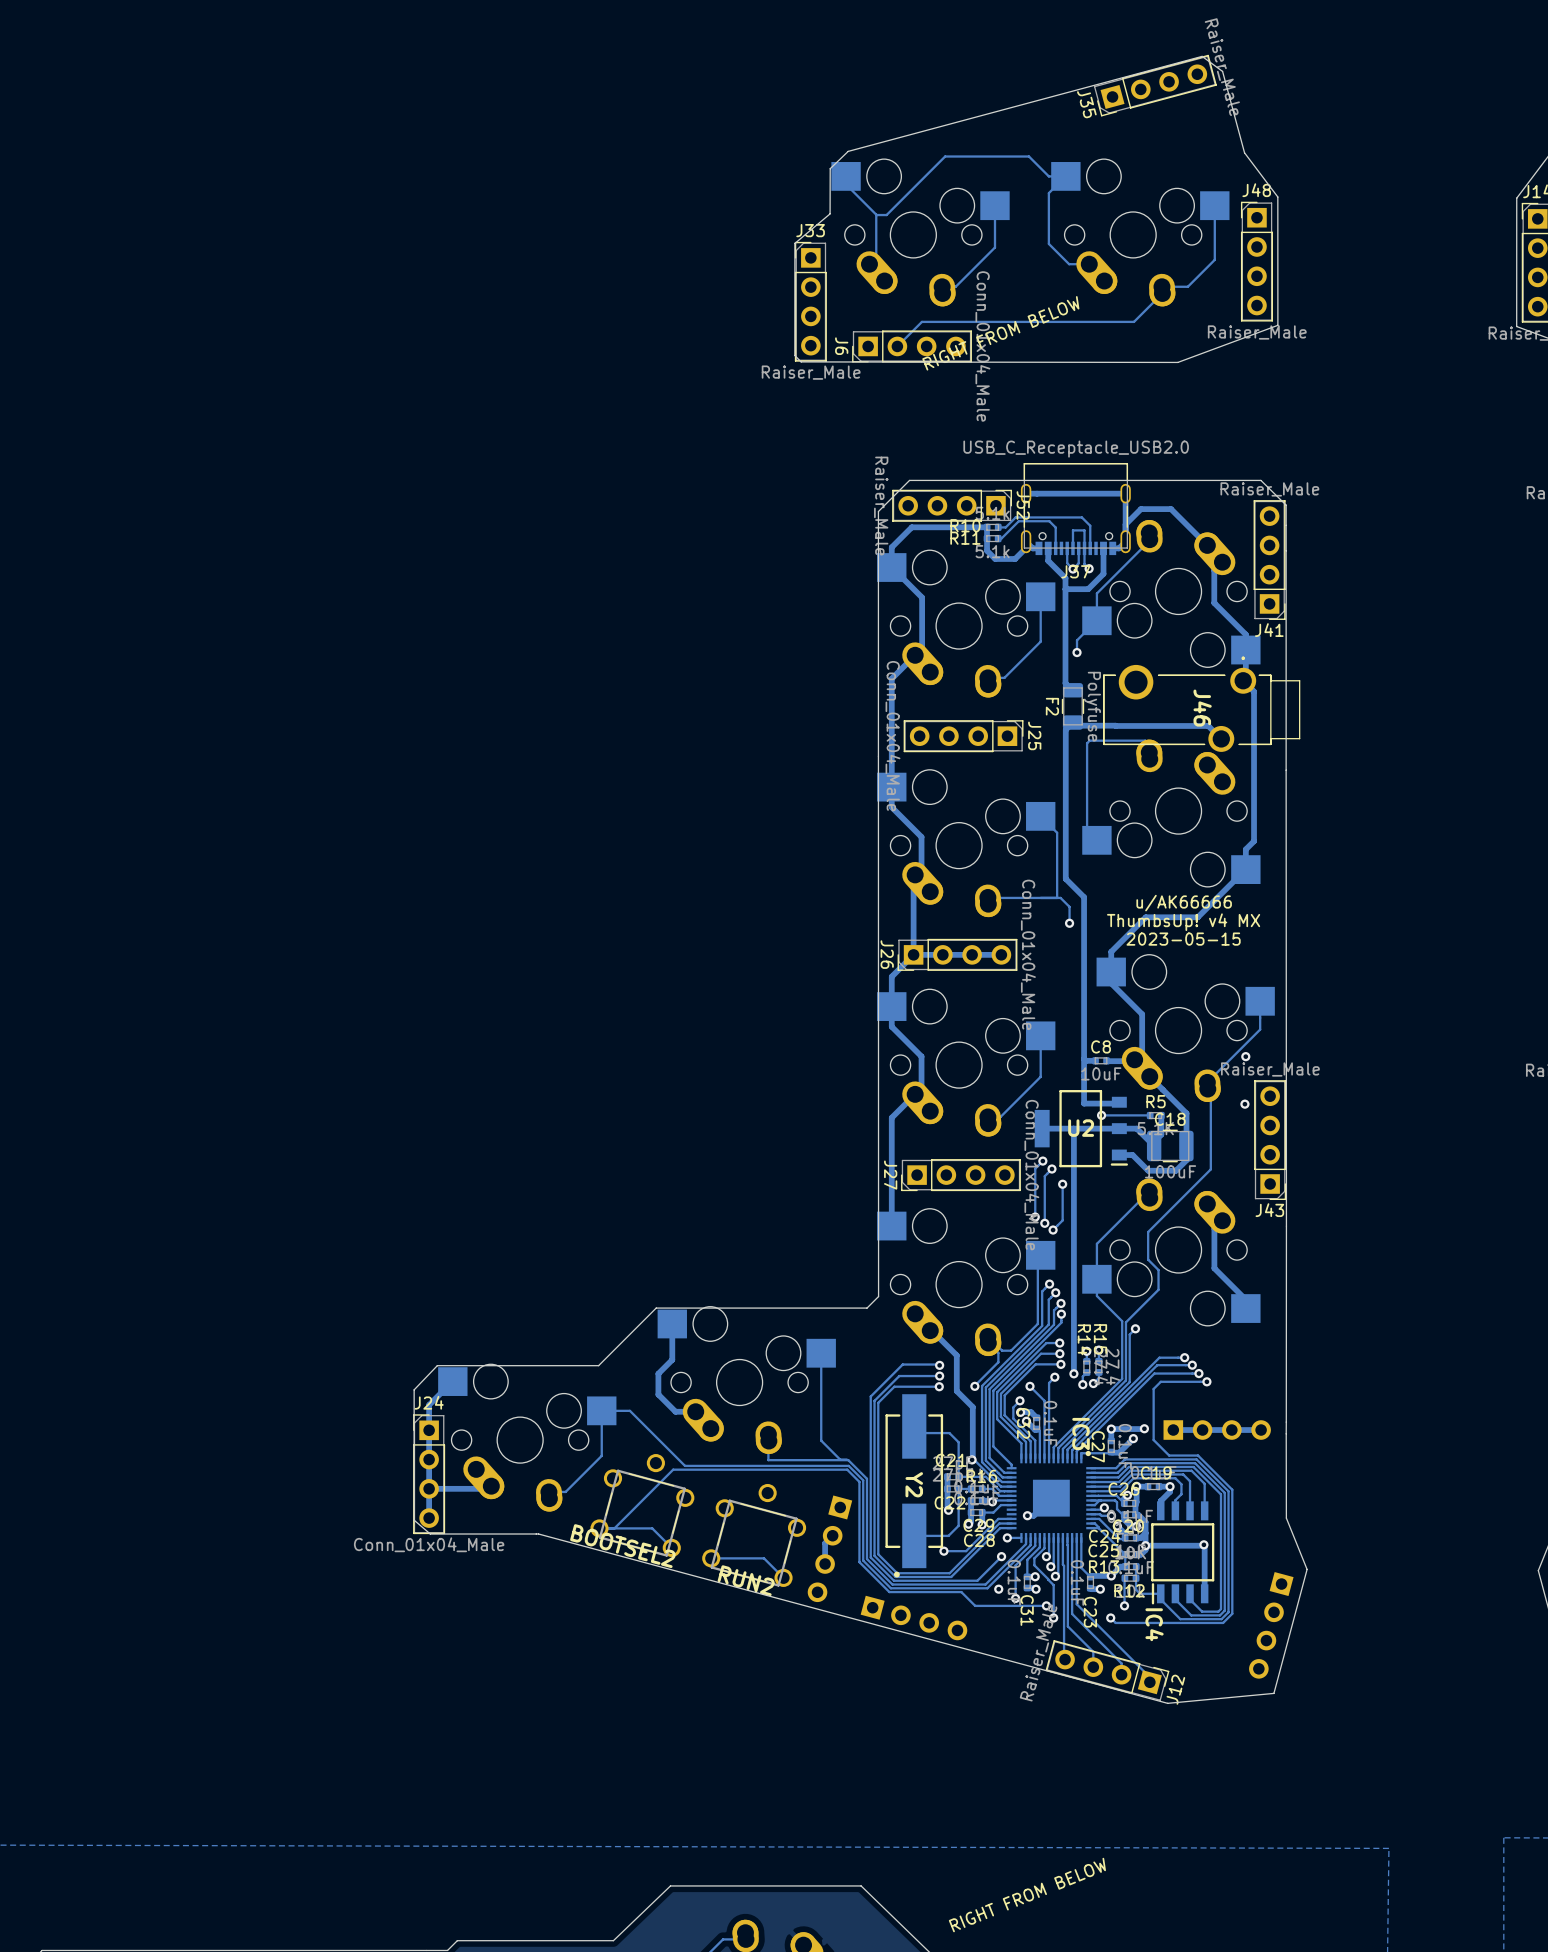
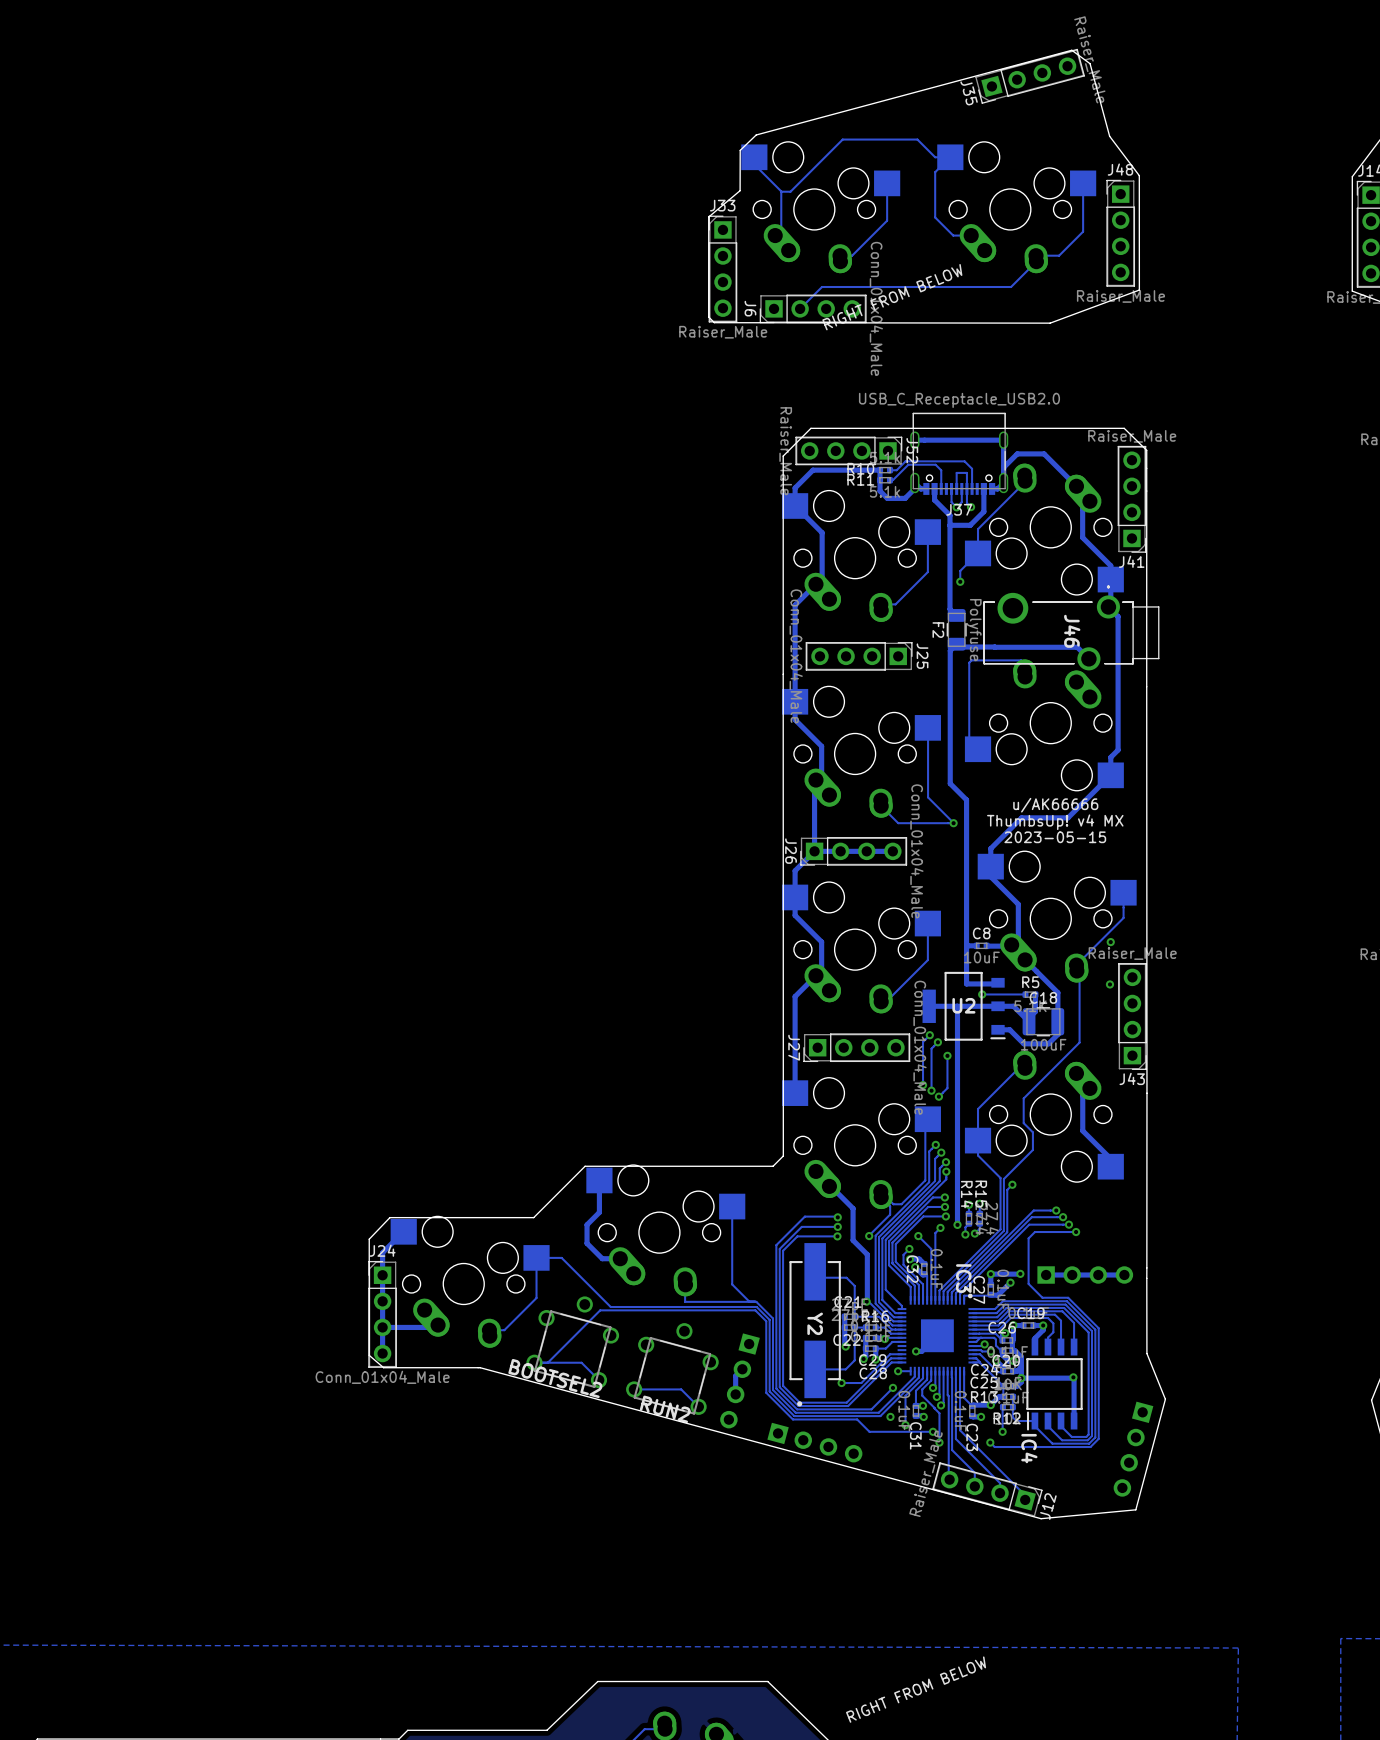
track: (1040, 816) (1057, 832) (1057, 897) -> (928, 728) (928, 797) (953, 823) (898, 823) (881, 806)
track: (988, 904) (994, 897) (1060, 897) (1069, 906) (1069, 923) -> none

